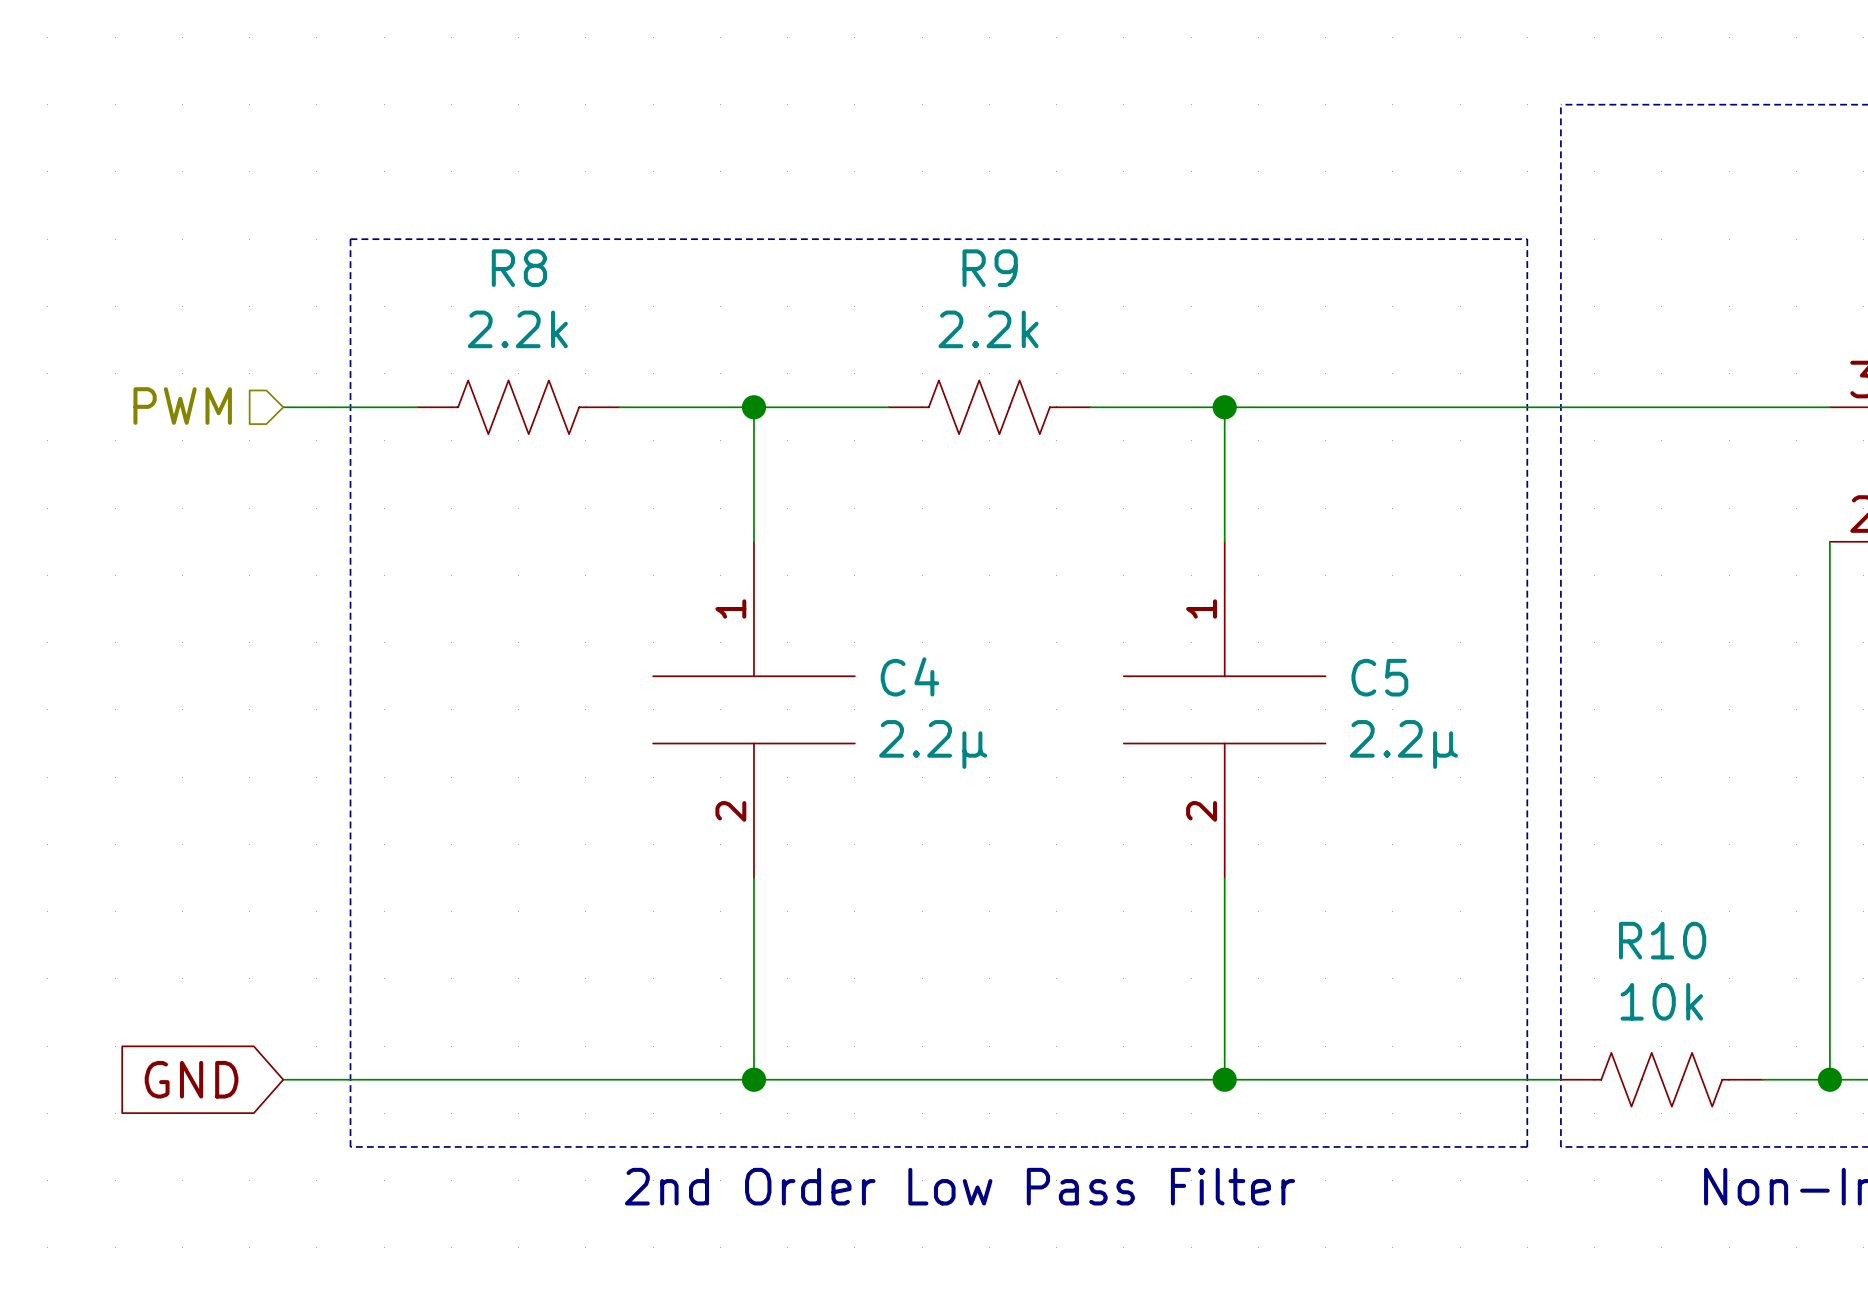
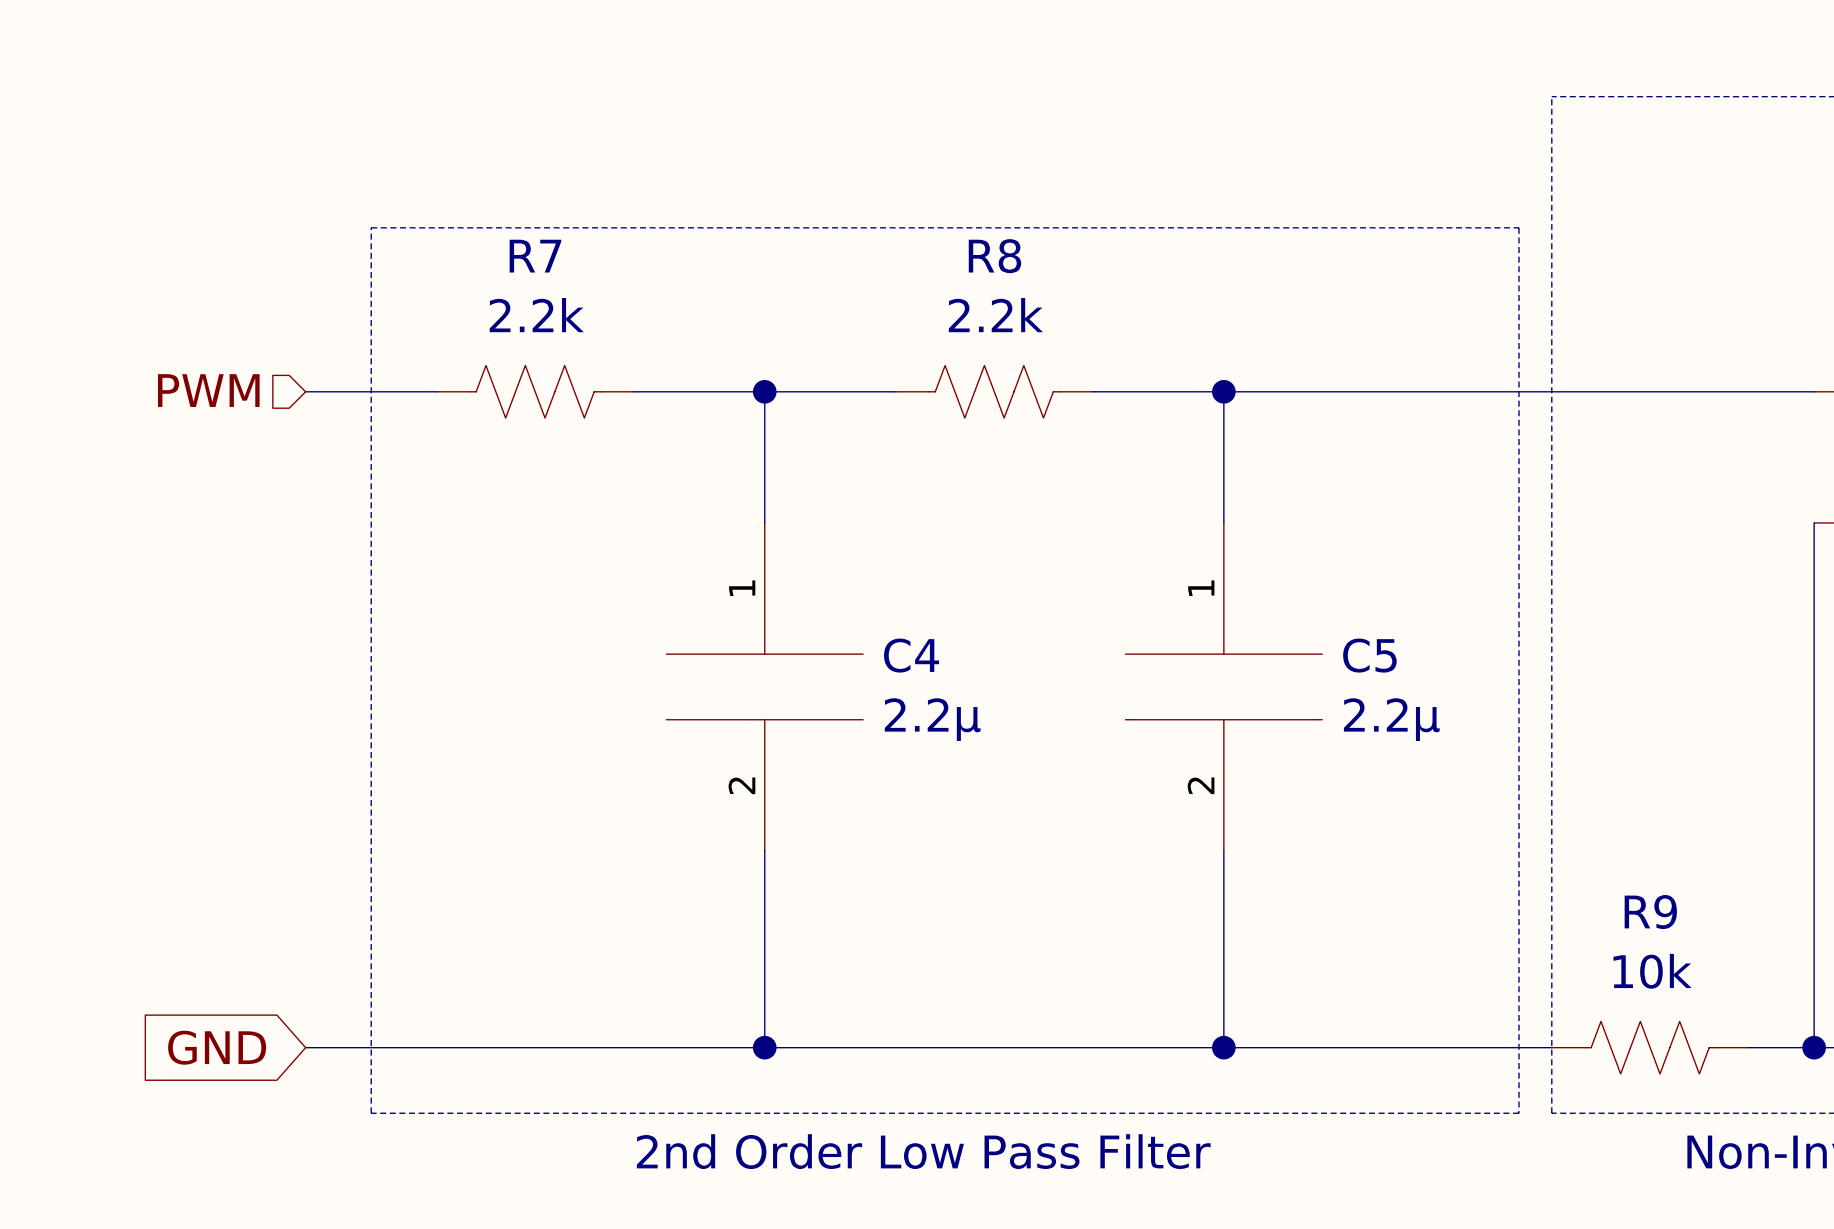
R8 name: R8 (519, 268) -> R7 (535, 256)
R9 name: R9 (990, 268) -> R8 (994, 256)
R10 name: R10 (1662, 940) -> R9 (1650, 912)

